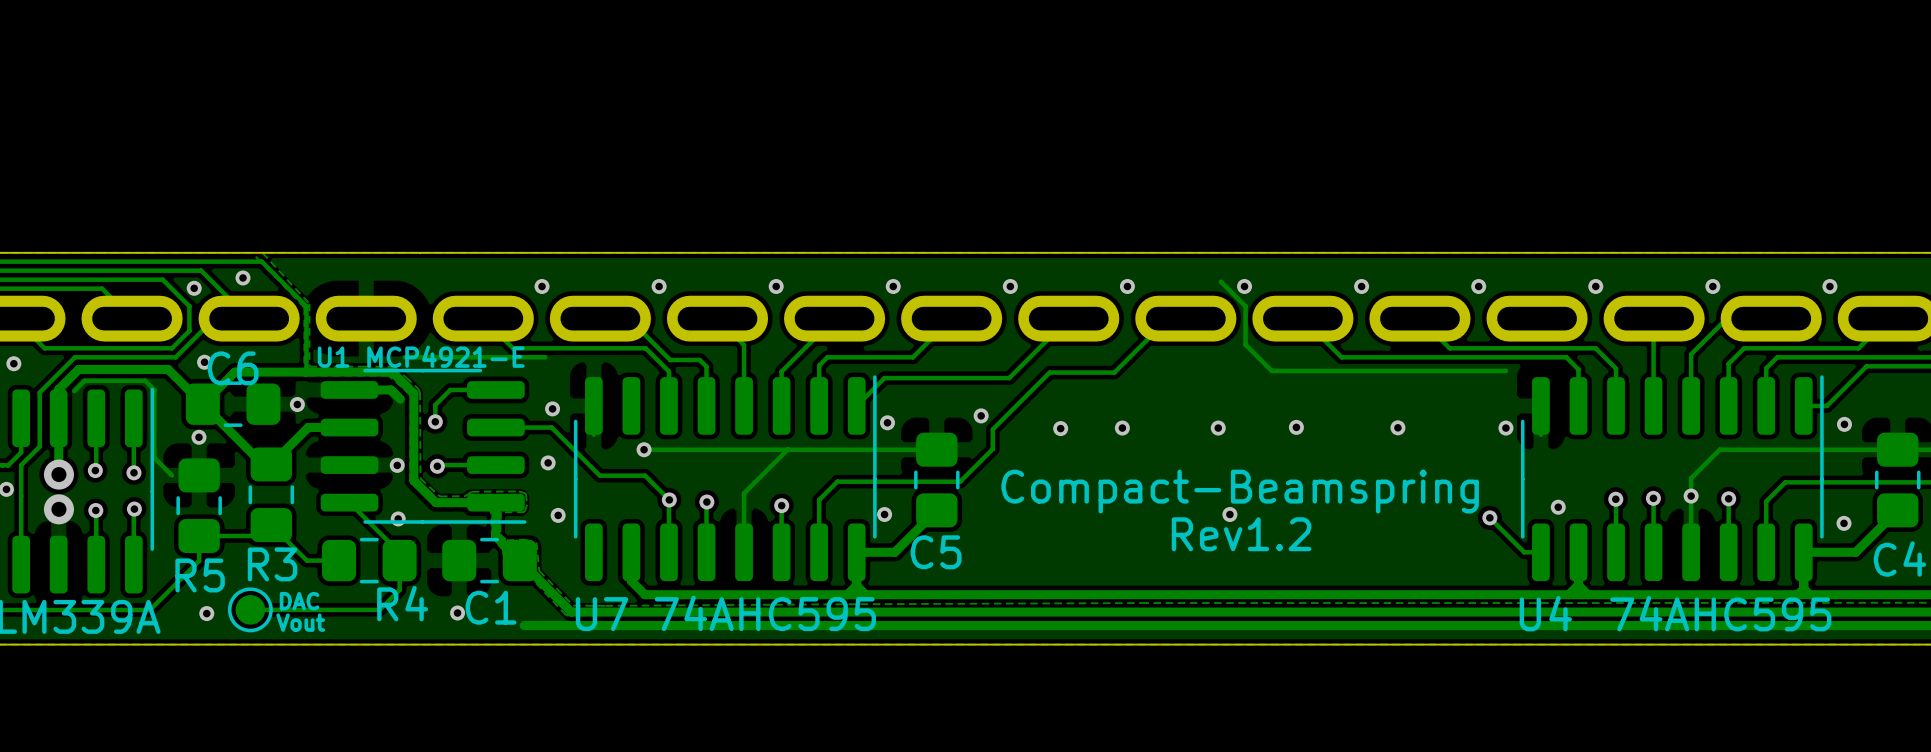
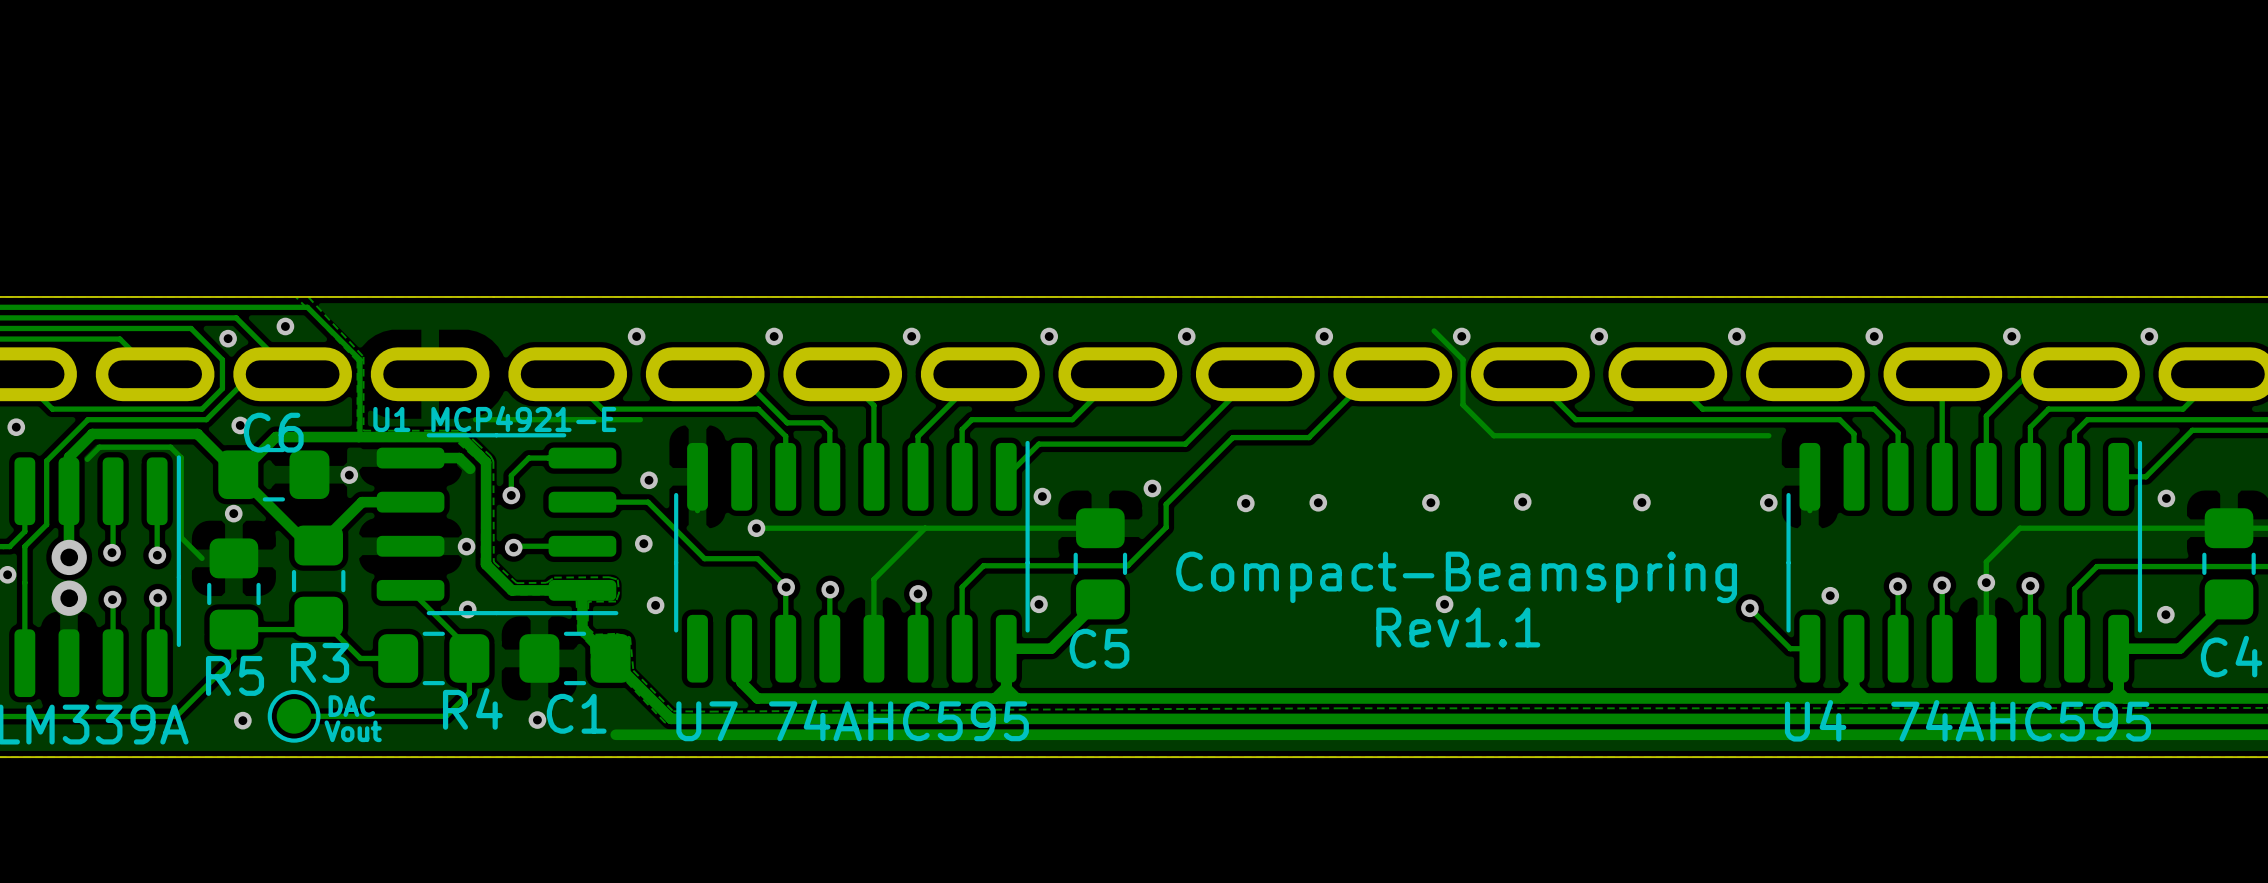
text: Rev1.2 (1241, 534) -> Rev1.1 (1458, 627)

